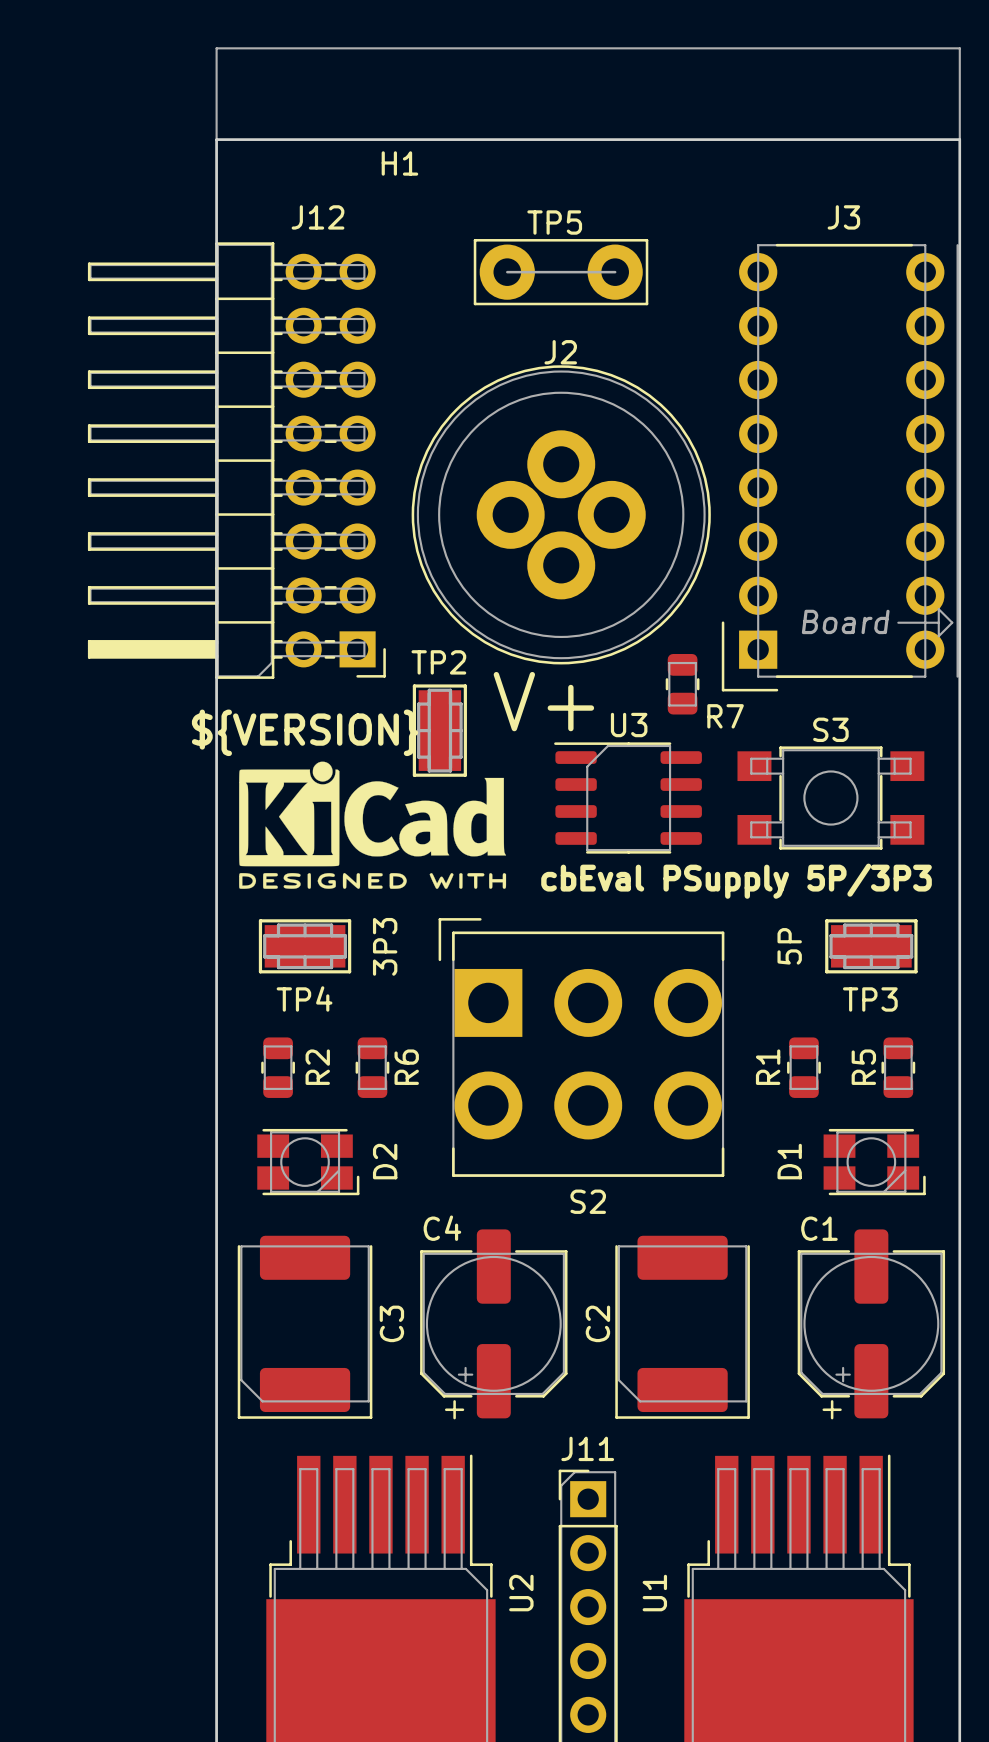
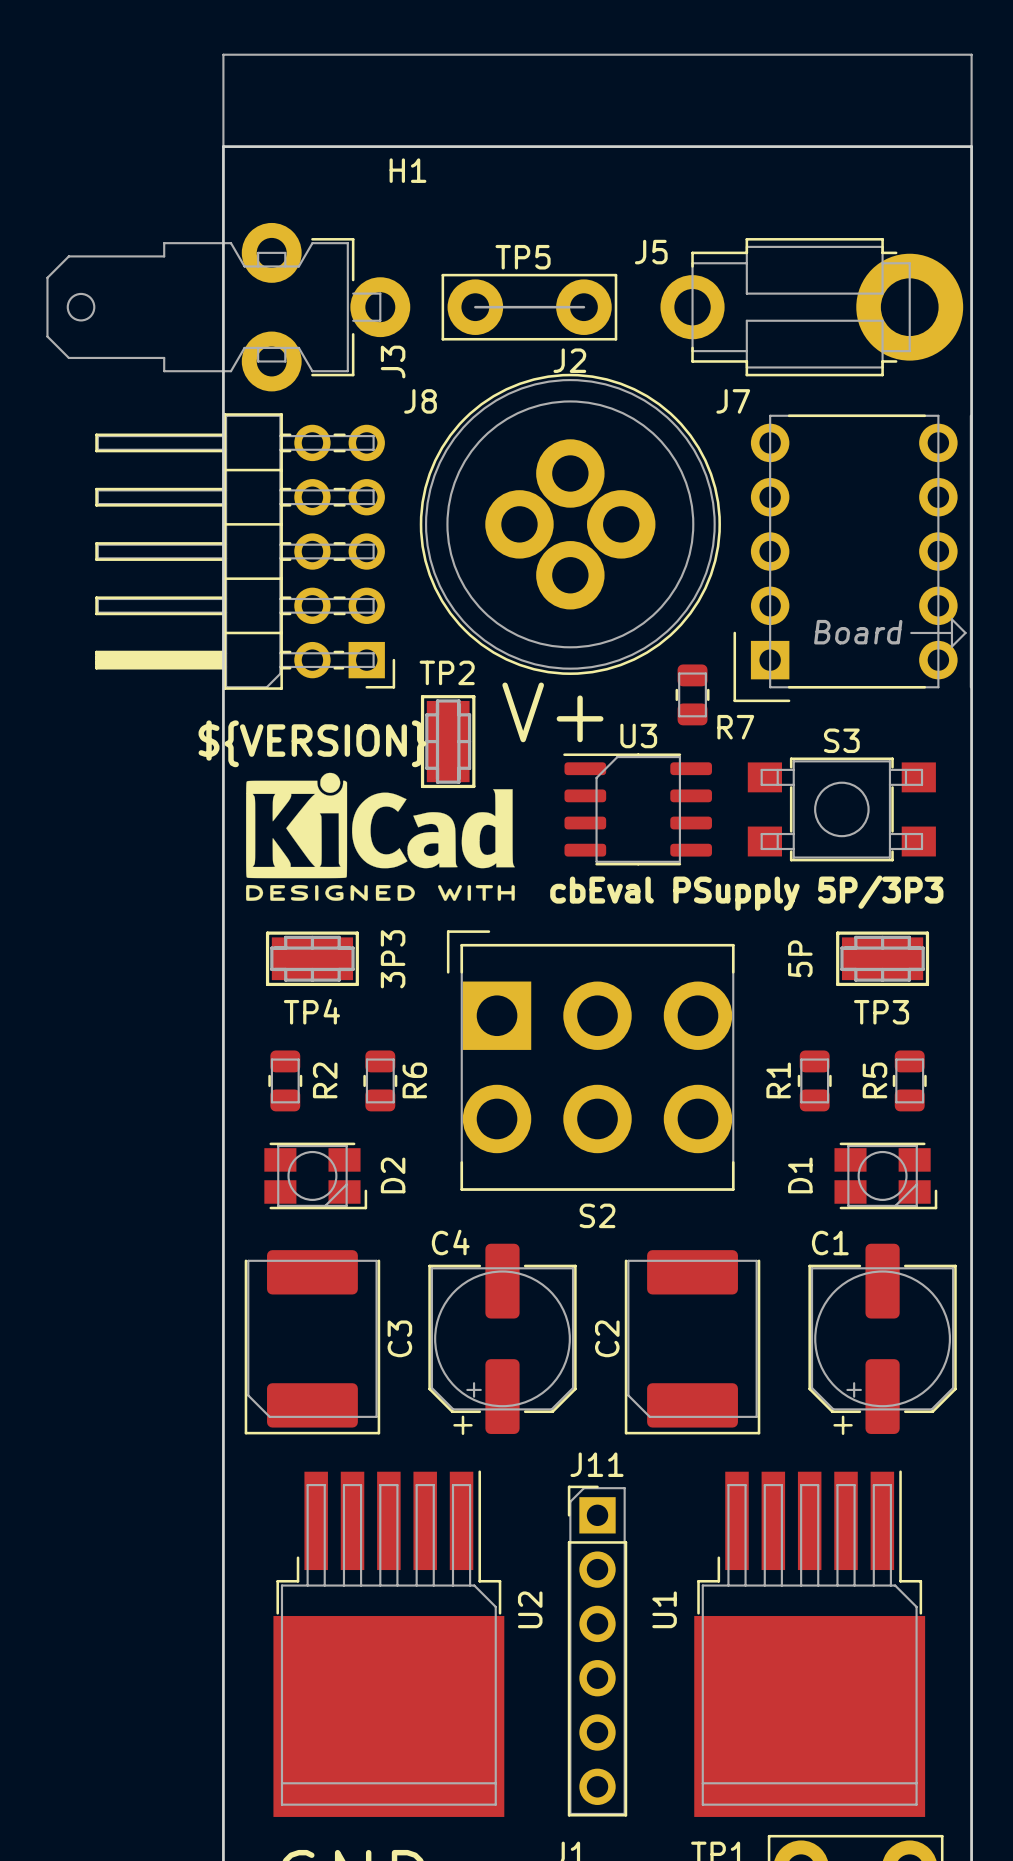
J3 name position: J3 (843, 217) -> J3 (393, 361)
J3 footprint: [721, 243, 959, 692] -> [46, 222, 411, 392]
TP5 position: (561, 272) -> (529, 307)
J5: none -> (811, 307)
J12: (236, 460) -> none
J8: none -> (245, 551)
J7: none -> (852, 558)

